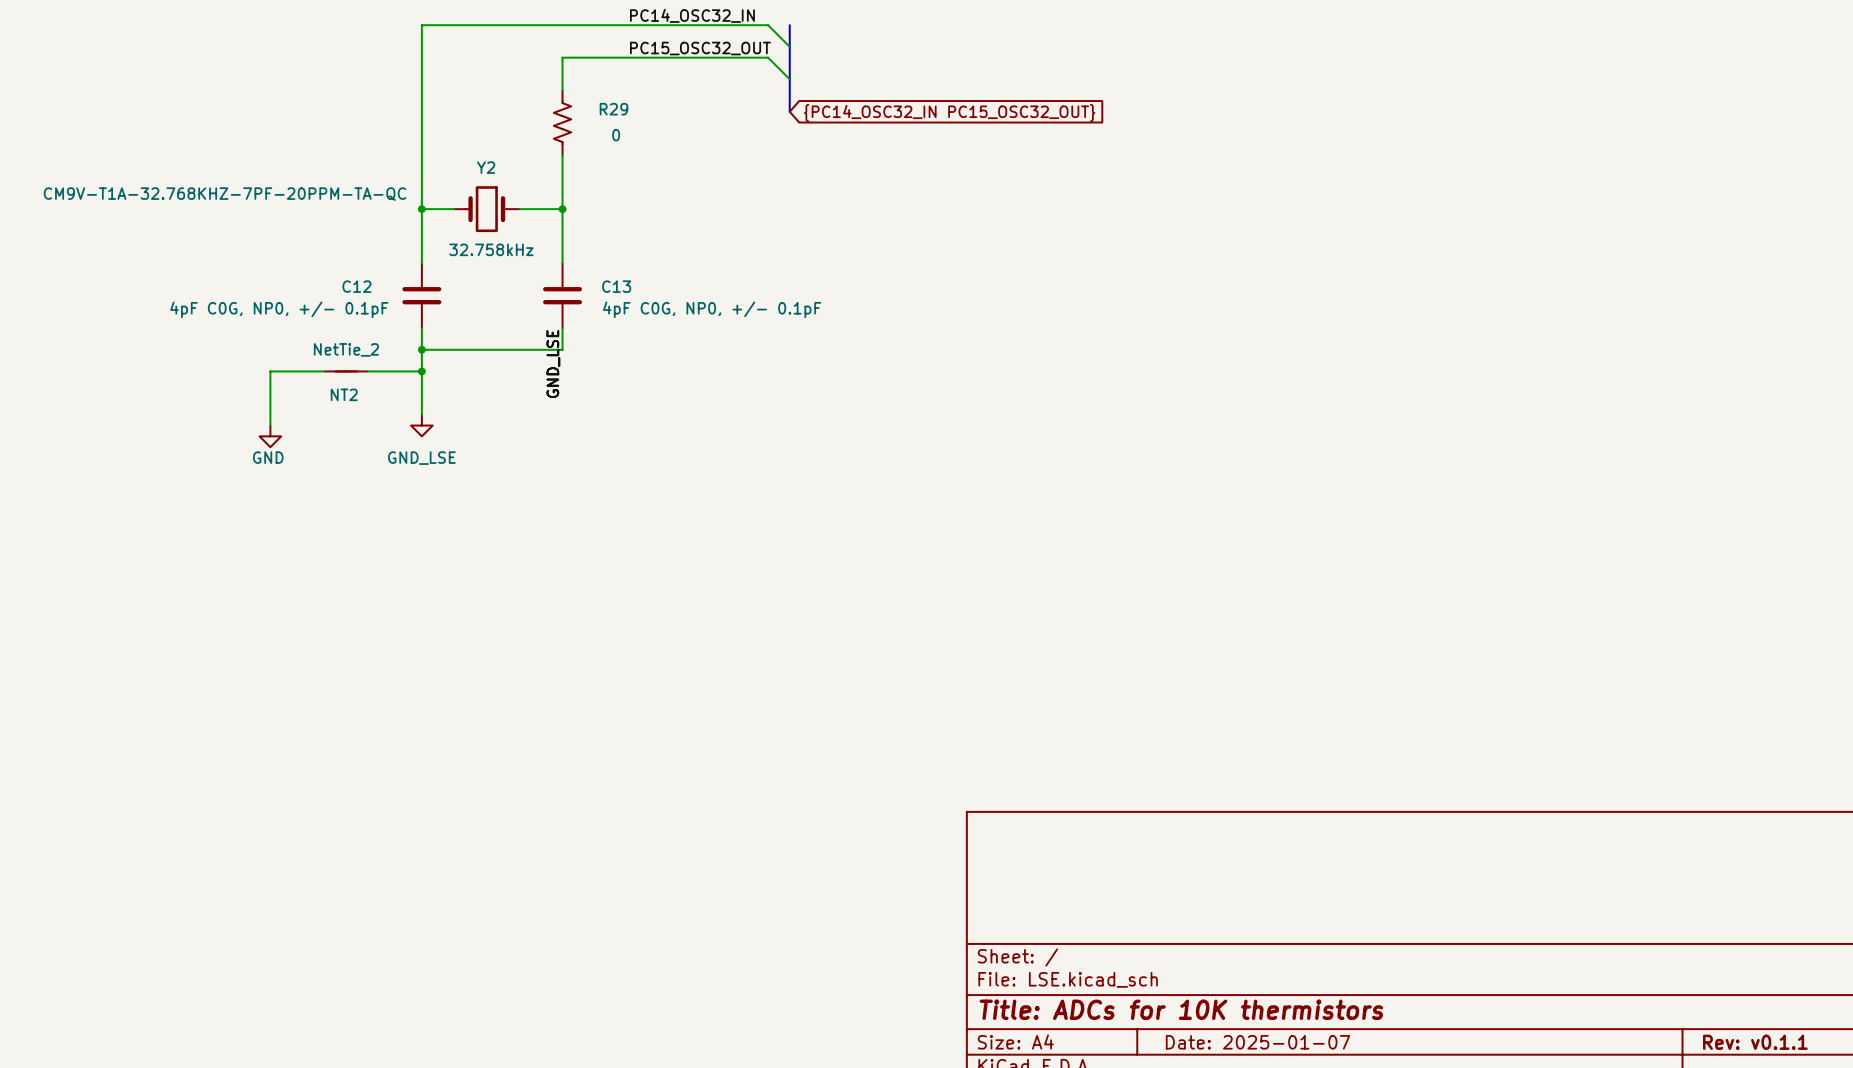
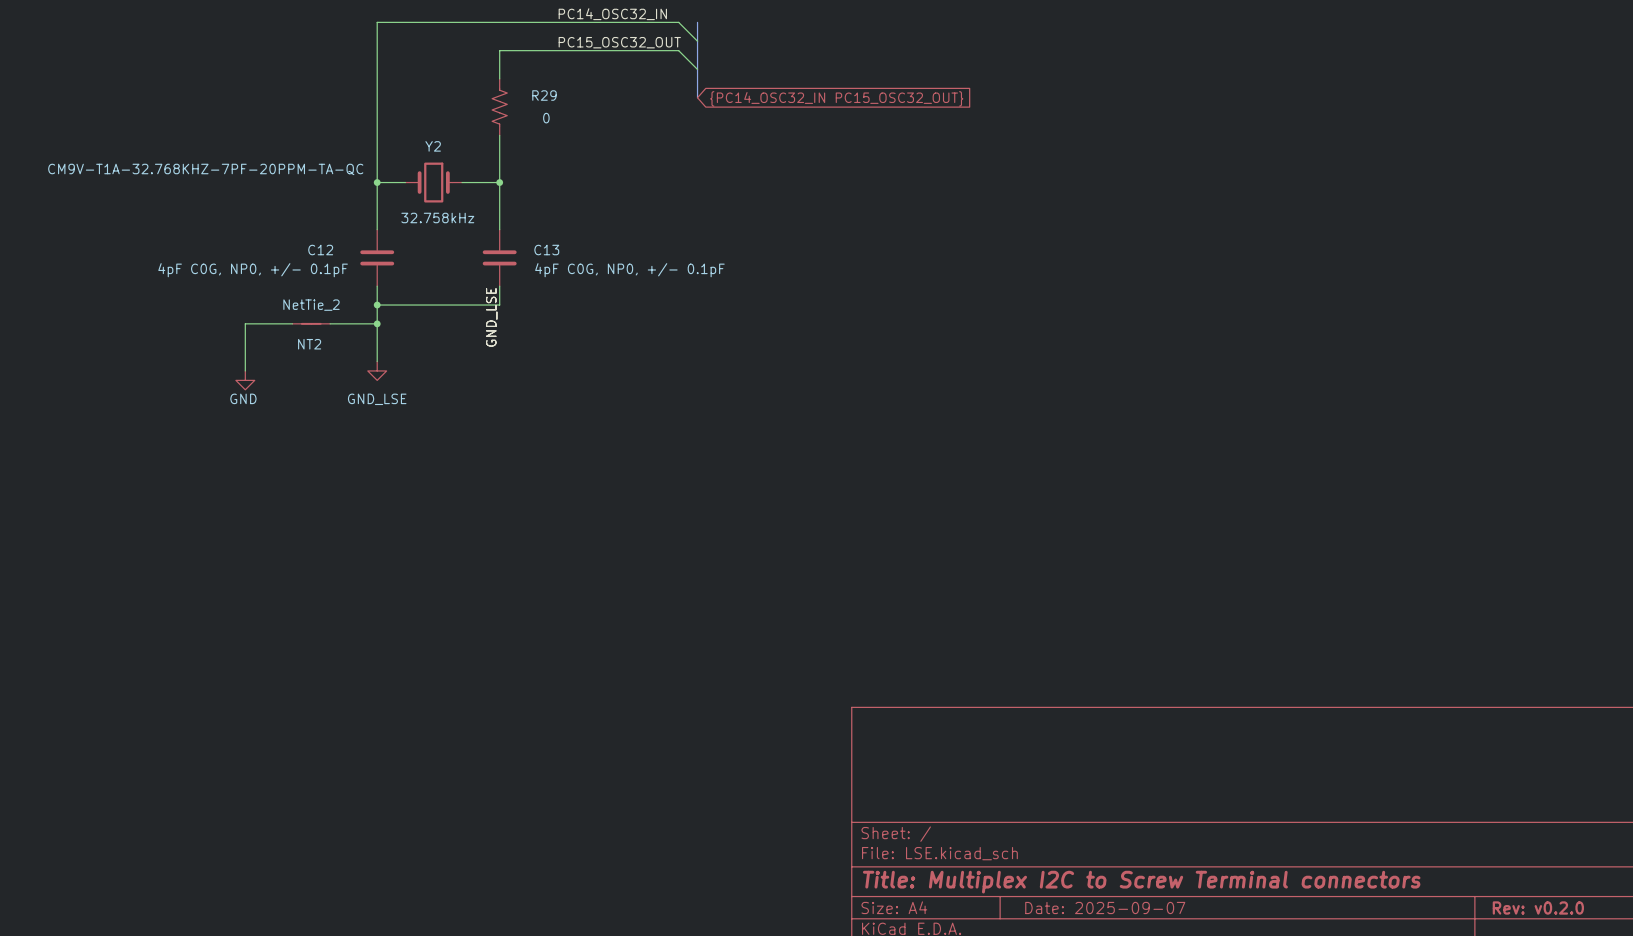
title block: Title: ADCs for 10K thermistors (1181, 1009) -> Title: Multiplex I2C to Screw Terminal connectors (1141, 882)
title block: Date: 2025-01-07 (1258, 1042) -> Date: 2025-09-07 (1105, 907)
title block: Rev: v0.1.1 (1755, 1042) -> Rev: v0.2.0 (1538, 907)

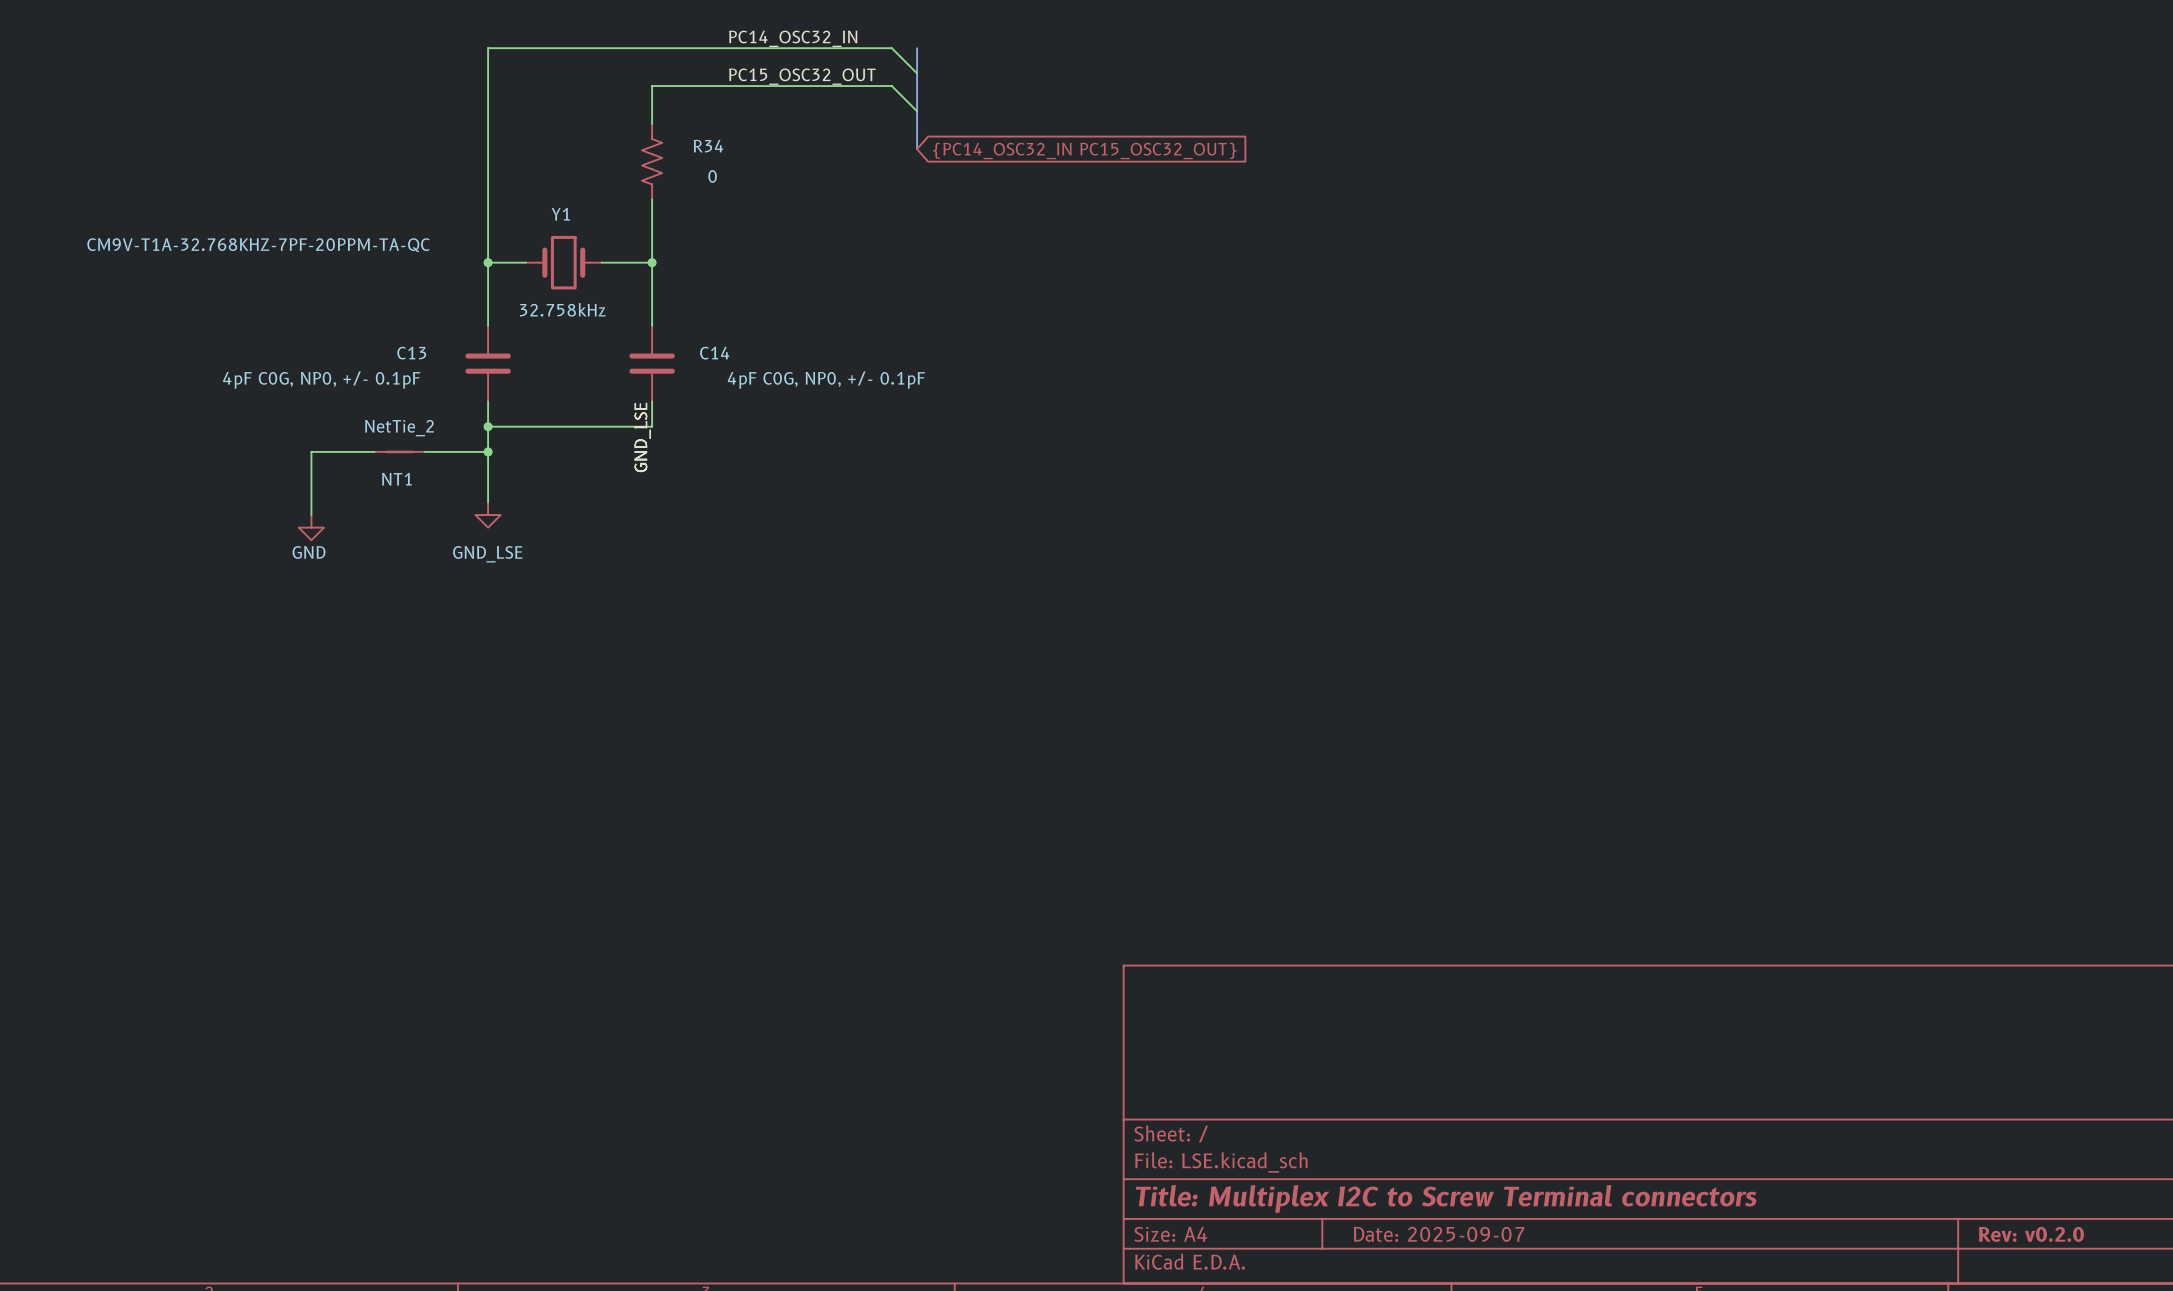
R29 name: R29 (544, 95) -> R34 (708, 146)
Y2 name: Y2 (433, 146) -> Y1 (560, 214)
C12 name: C12 (320, 250) -> C13 (411, 353)
C13 name: C13 (546, 250) -> C14 (714, 353)
NT2 name: NT2 (309, 344) -> NT1 (396, 479)

